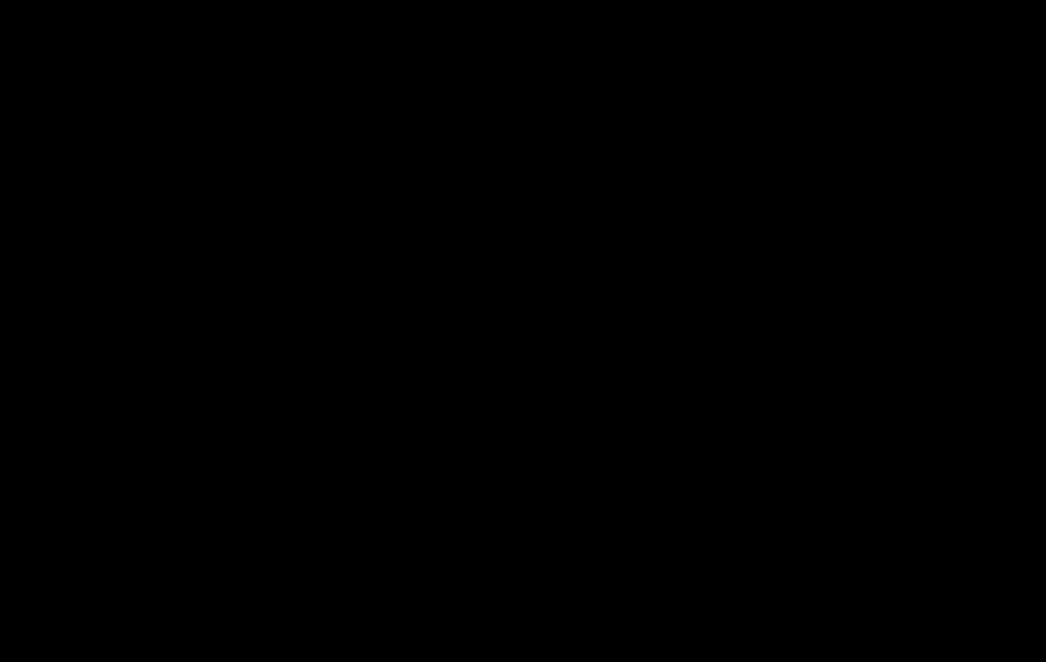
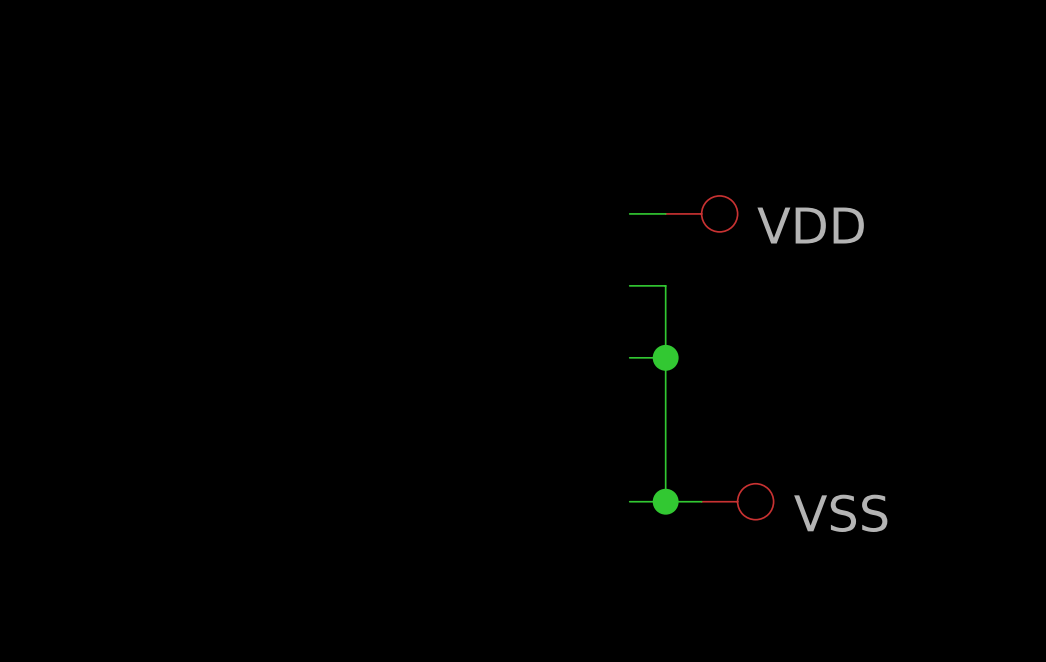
wire: none -> (629, 213) (665, 213)
power symbol: none -> VDD (701, 213)
wire: none -> (629, 285) (665, 285) (665, 501)
wire: none -> (629, 357) (665, 357)
junction: none -> (665, 357)
wire: none -> (629, 501) (701, 501)
junction: none -> (665, 501)
power symbol: none -> VSS (737, 501)

